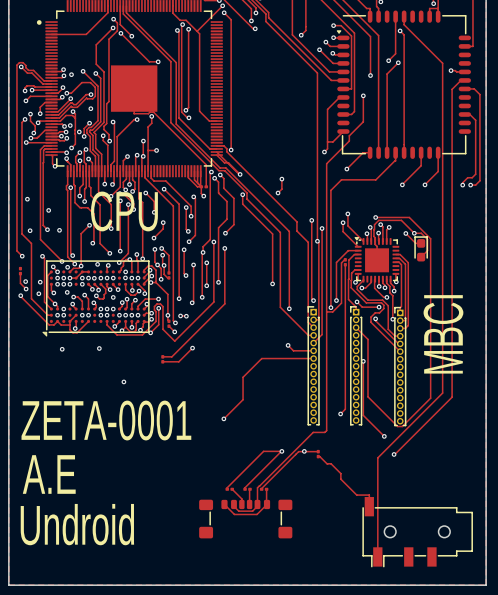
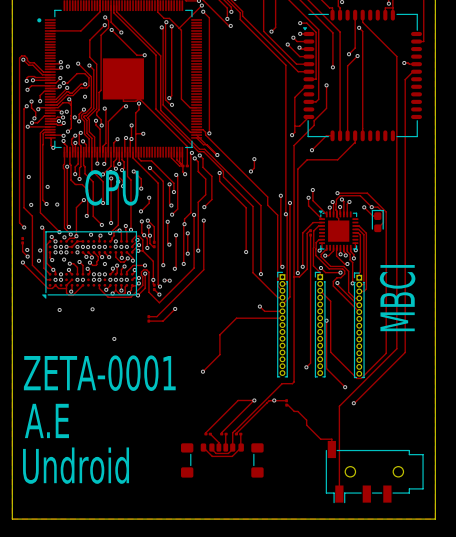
track: (464, 88) (474, 88) (479, 94) (479, 180) (475, 185) (470, 185) -> none
track: (464, 114) (469, 114) (475, 120) (475, 174) (472, 177) (467, 177) (462, 185) -> none
track: (421, 152) (421, 165) (402, 184) -> none
track: (438, 152) (438, 171) (425, 184) -> none
via: (402, 184) -> none
via: (425, 184) -> none
via: (462, 185) -> none
via: (470, 185) -> none

